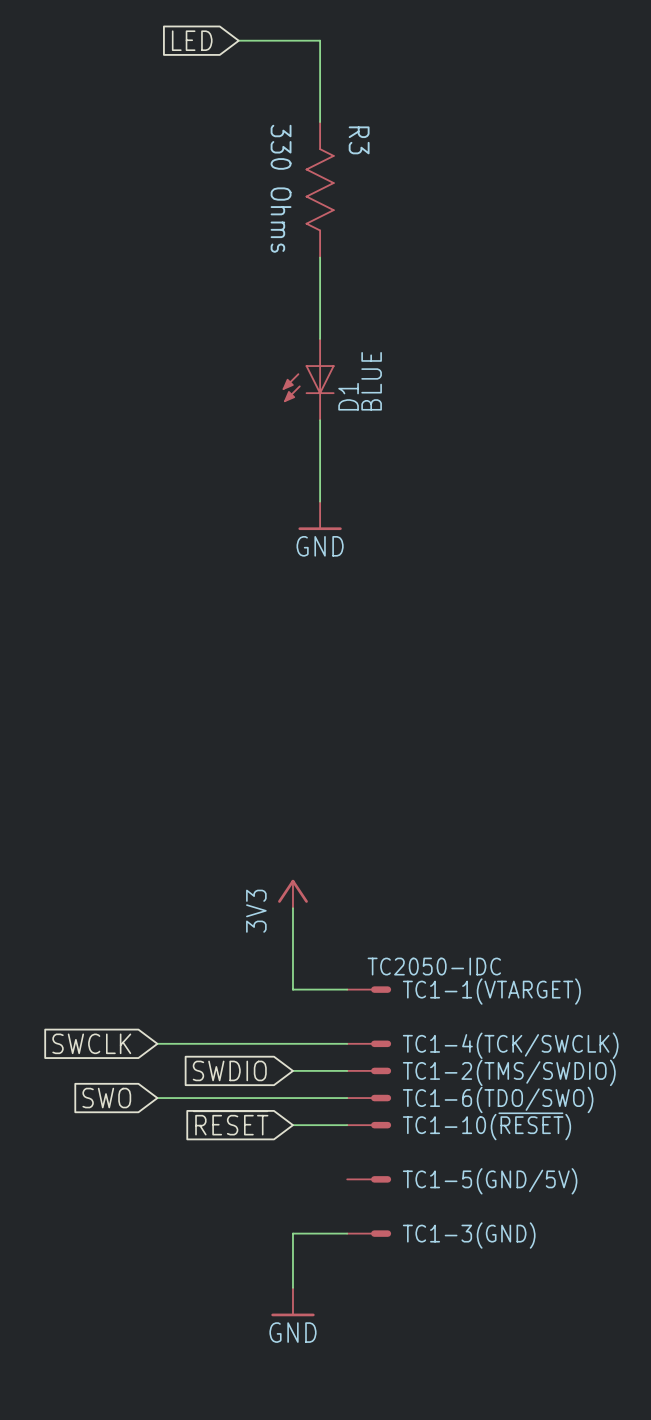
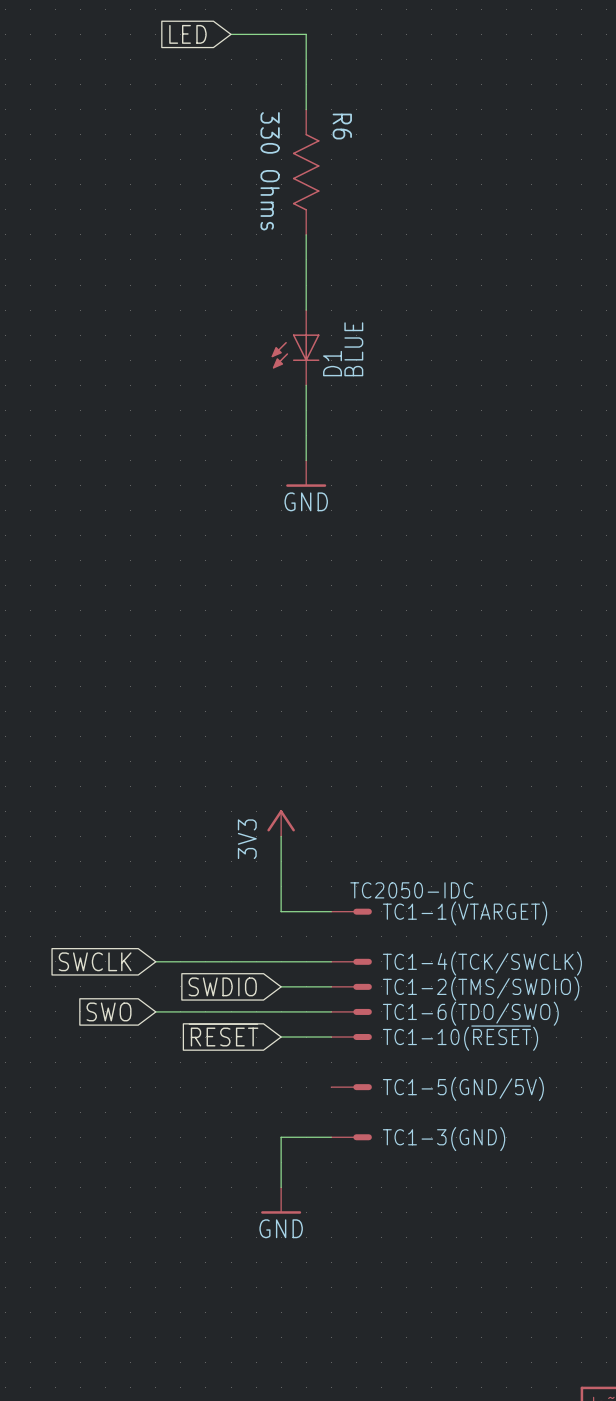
R3 name: R3 (359, 140) -> R6 (342, 126)

